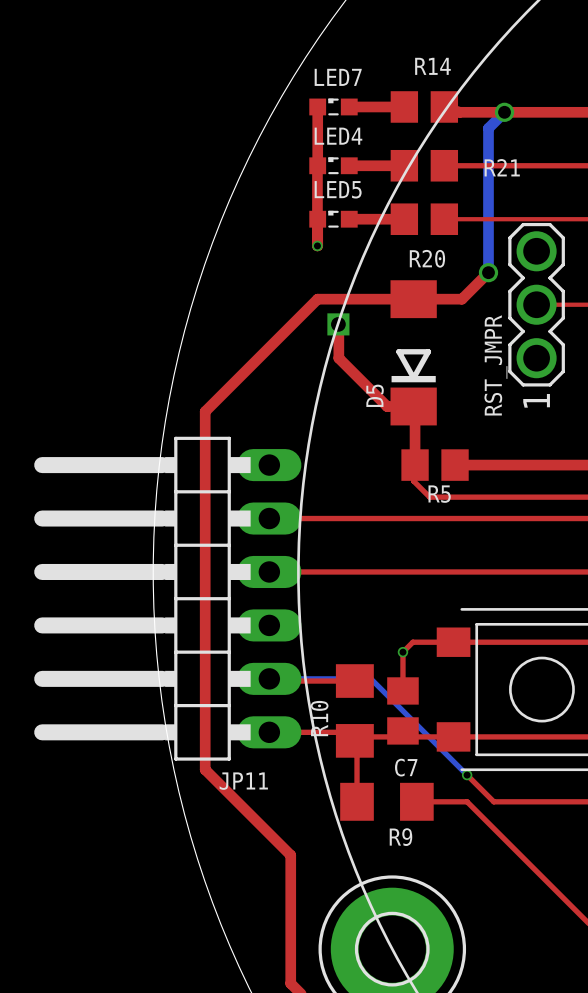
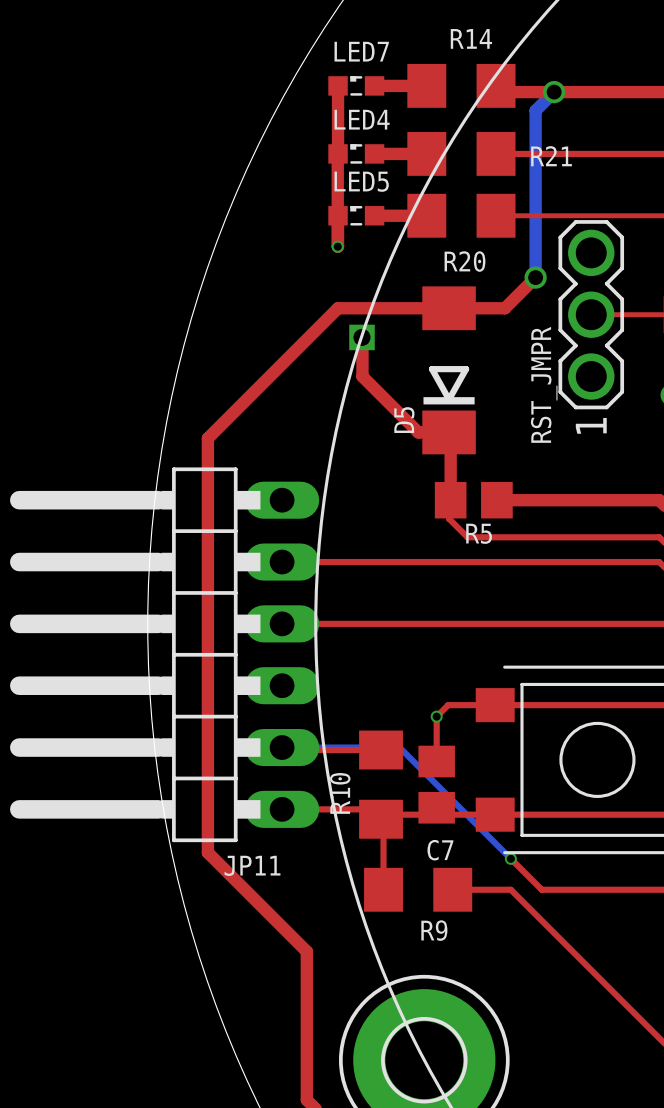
R14 footprint: [390, 91, 459, 123] -> [407, 63, 516, 108]
R21 footprint: [390, 149, 459, 182] -> [407, 131, 516, 176]
R20 footprint: [390, 203, 459, 235] -> [407, 193, 516, 238]

